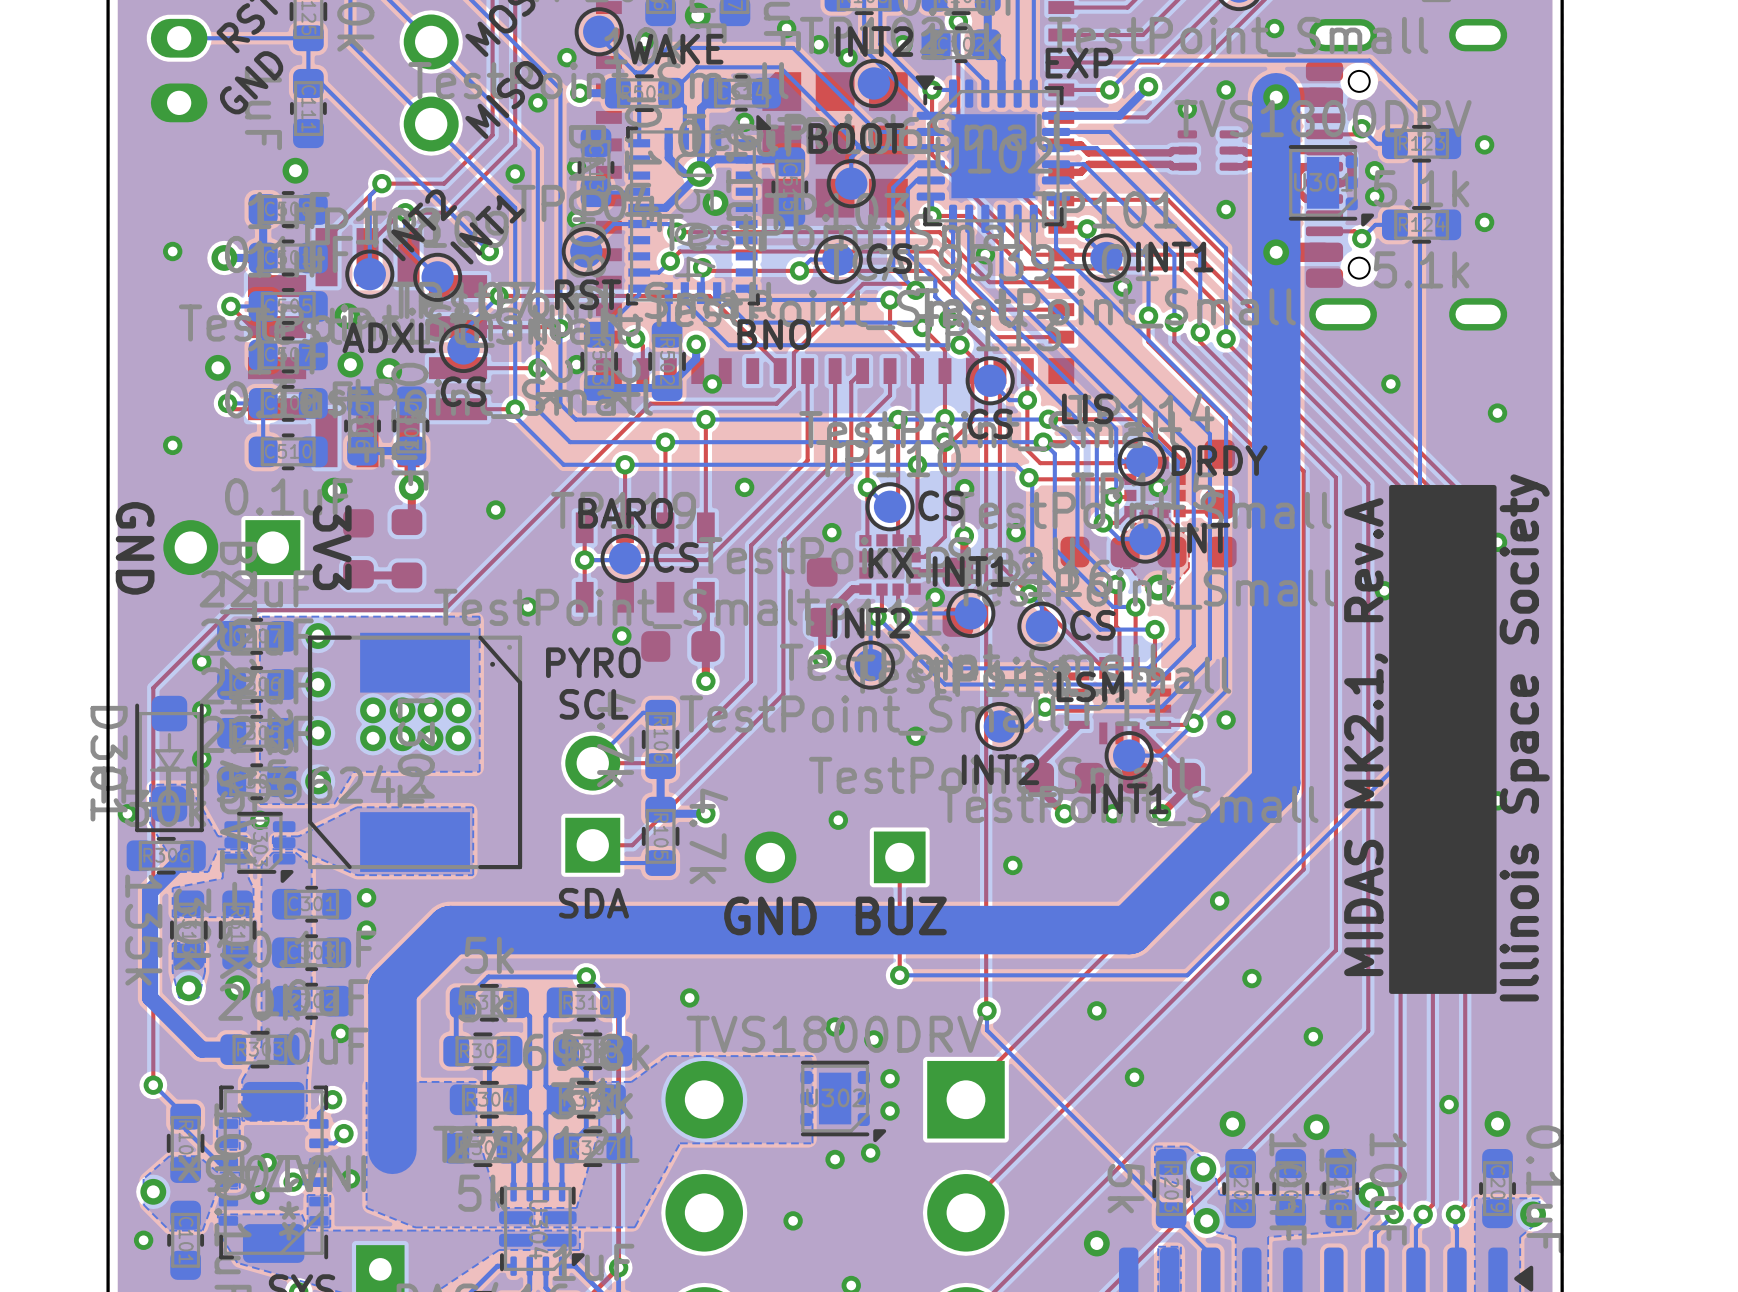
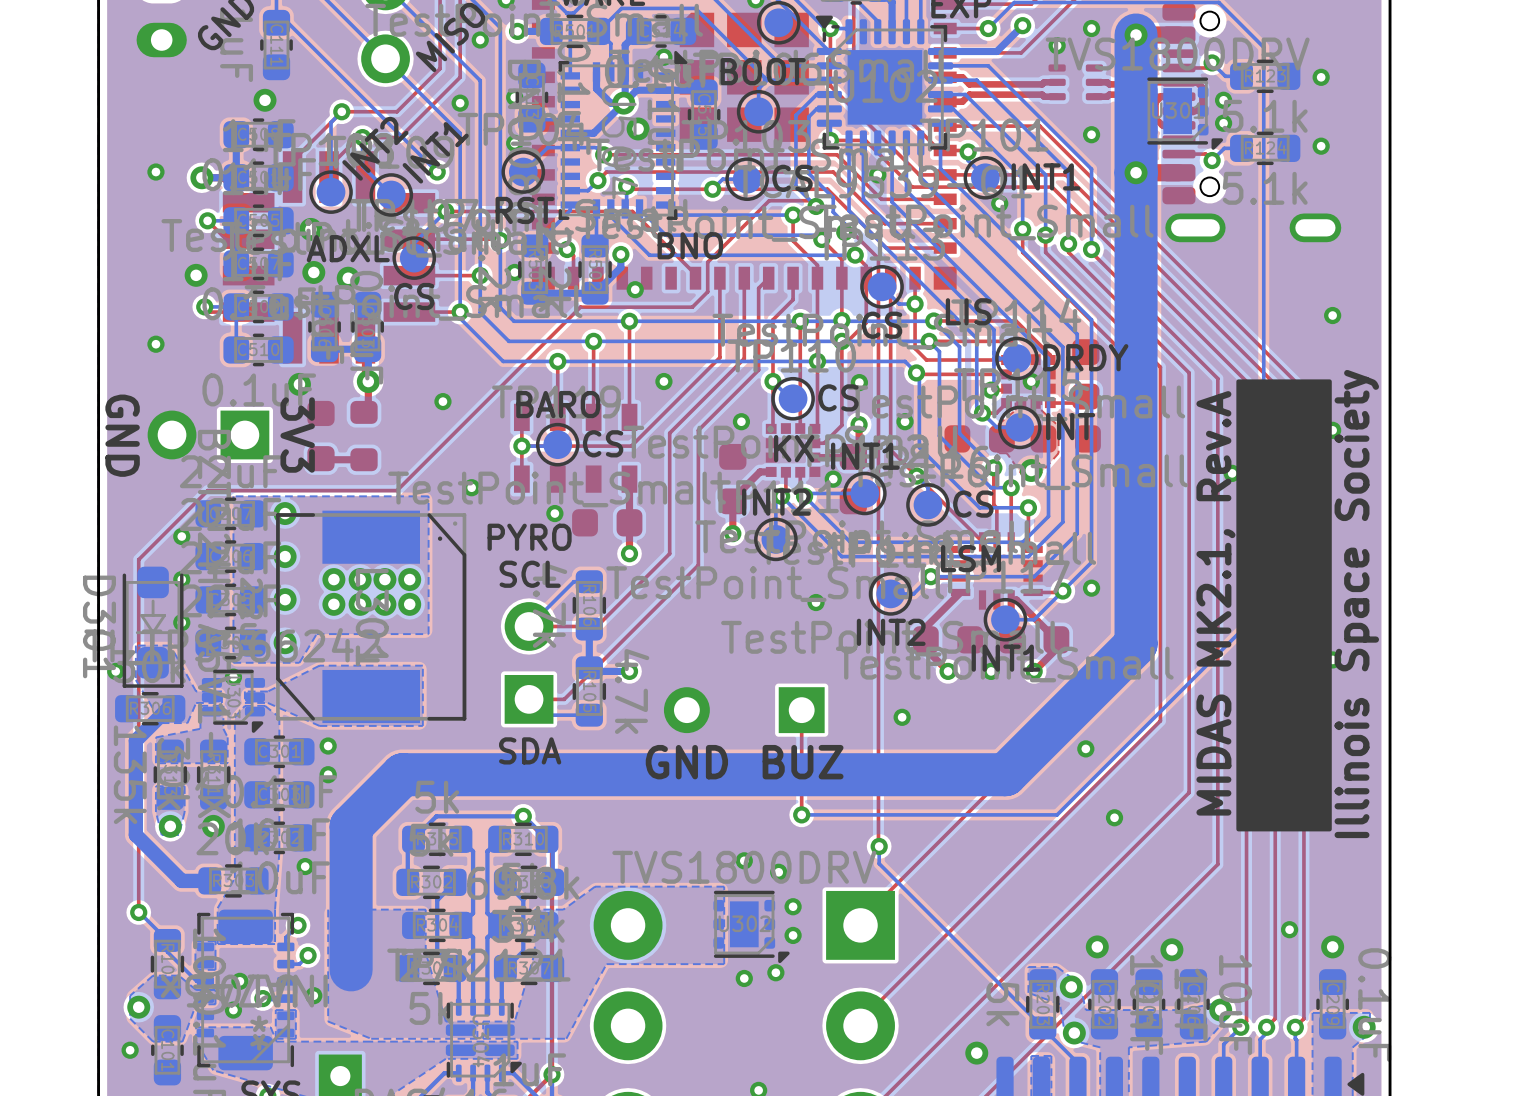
via: (1390, 383) -> none
via: (838, 820) -> none
via: (689, 997) -> none
via: (1096, 1010) -> none
via: (1313, 1036) -> none
via: (1134, 1077) -> none
via: (793, 1220) -> none

